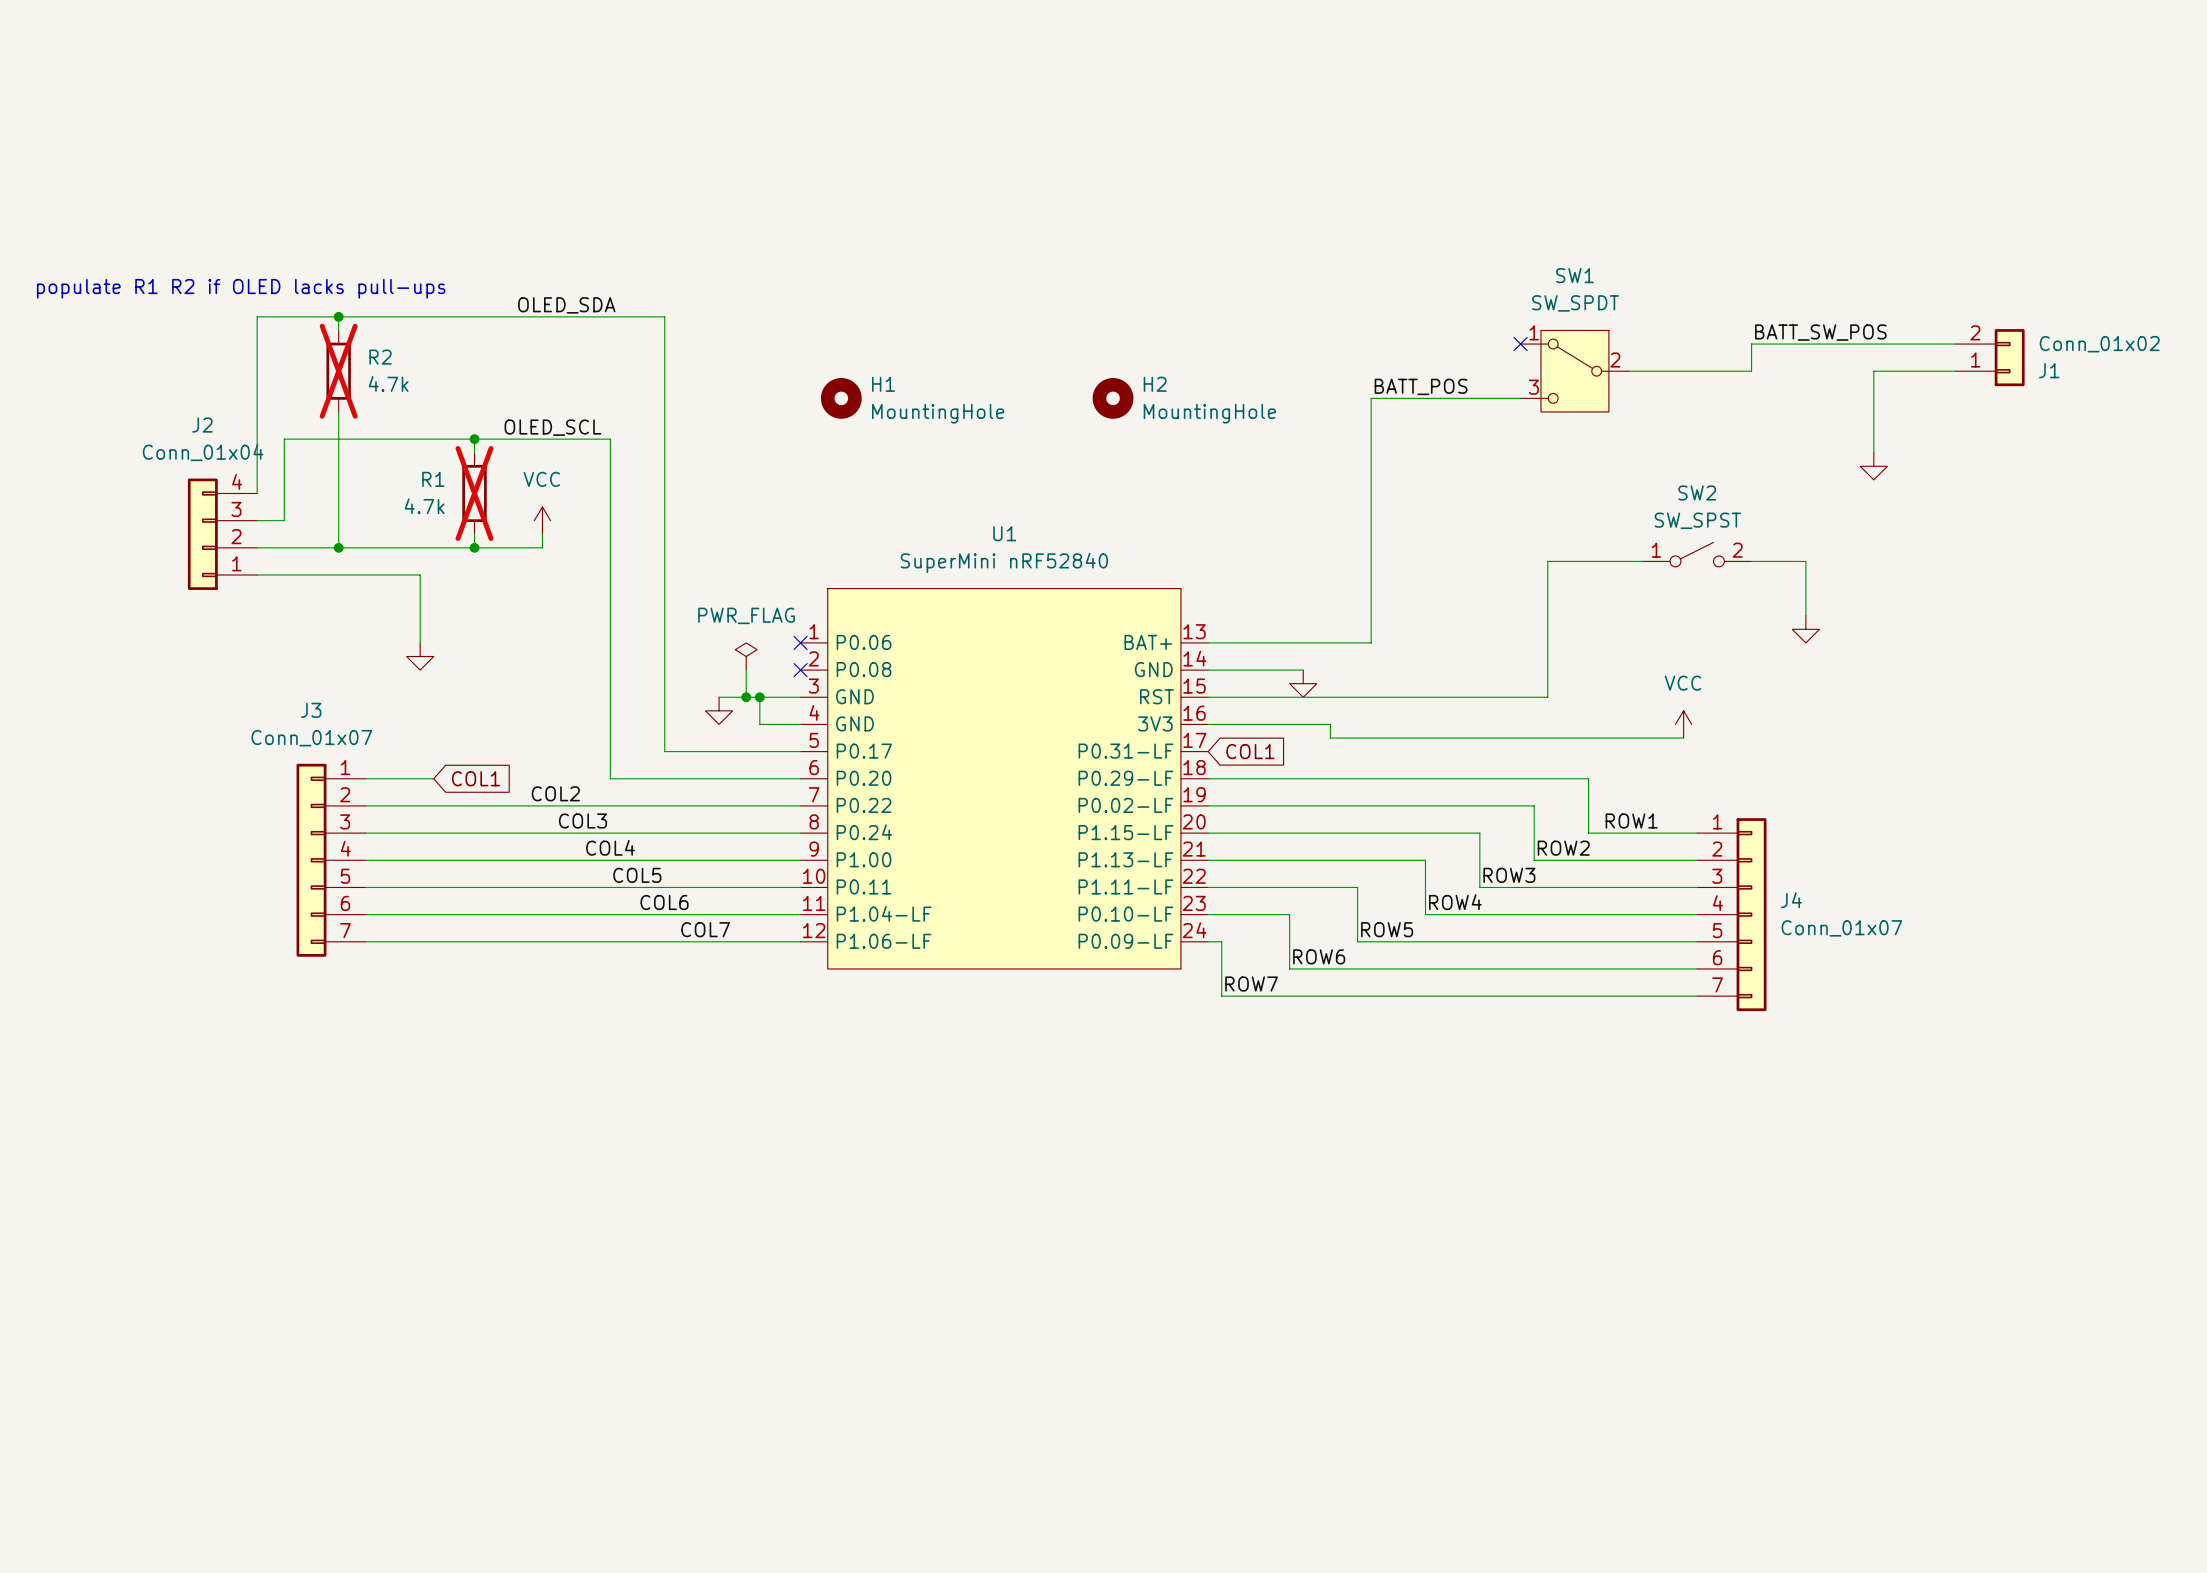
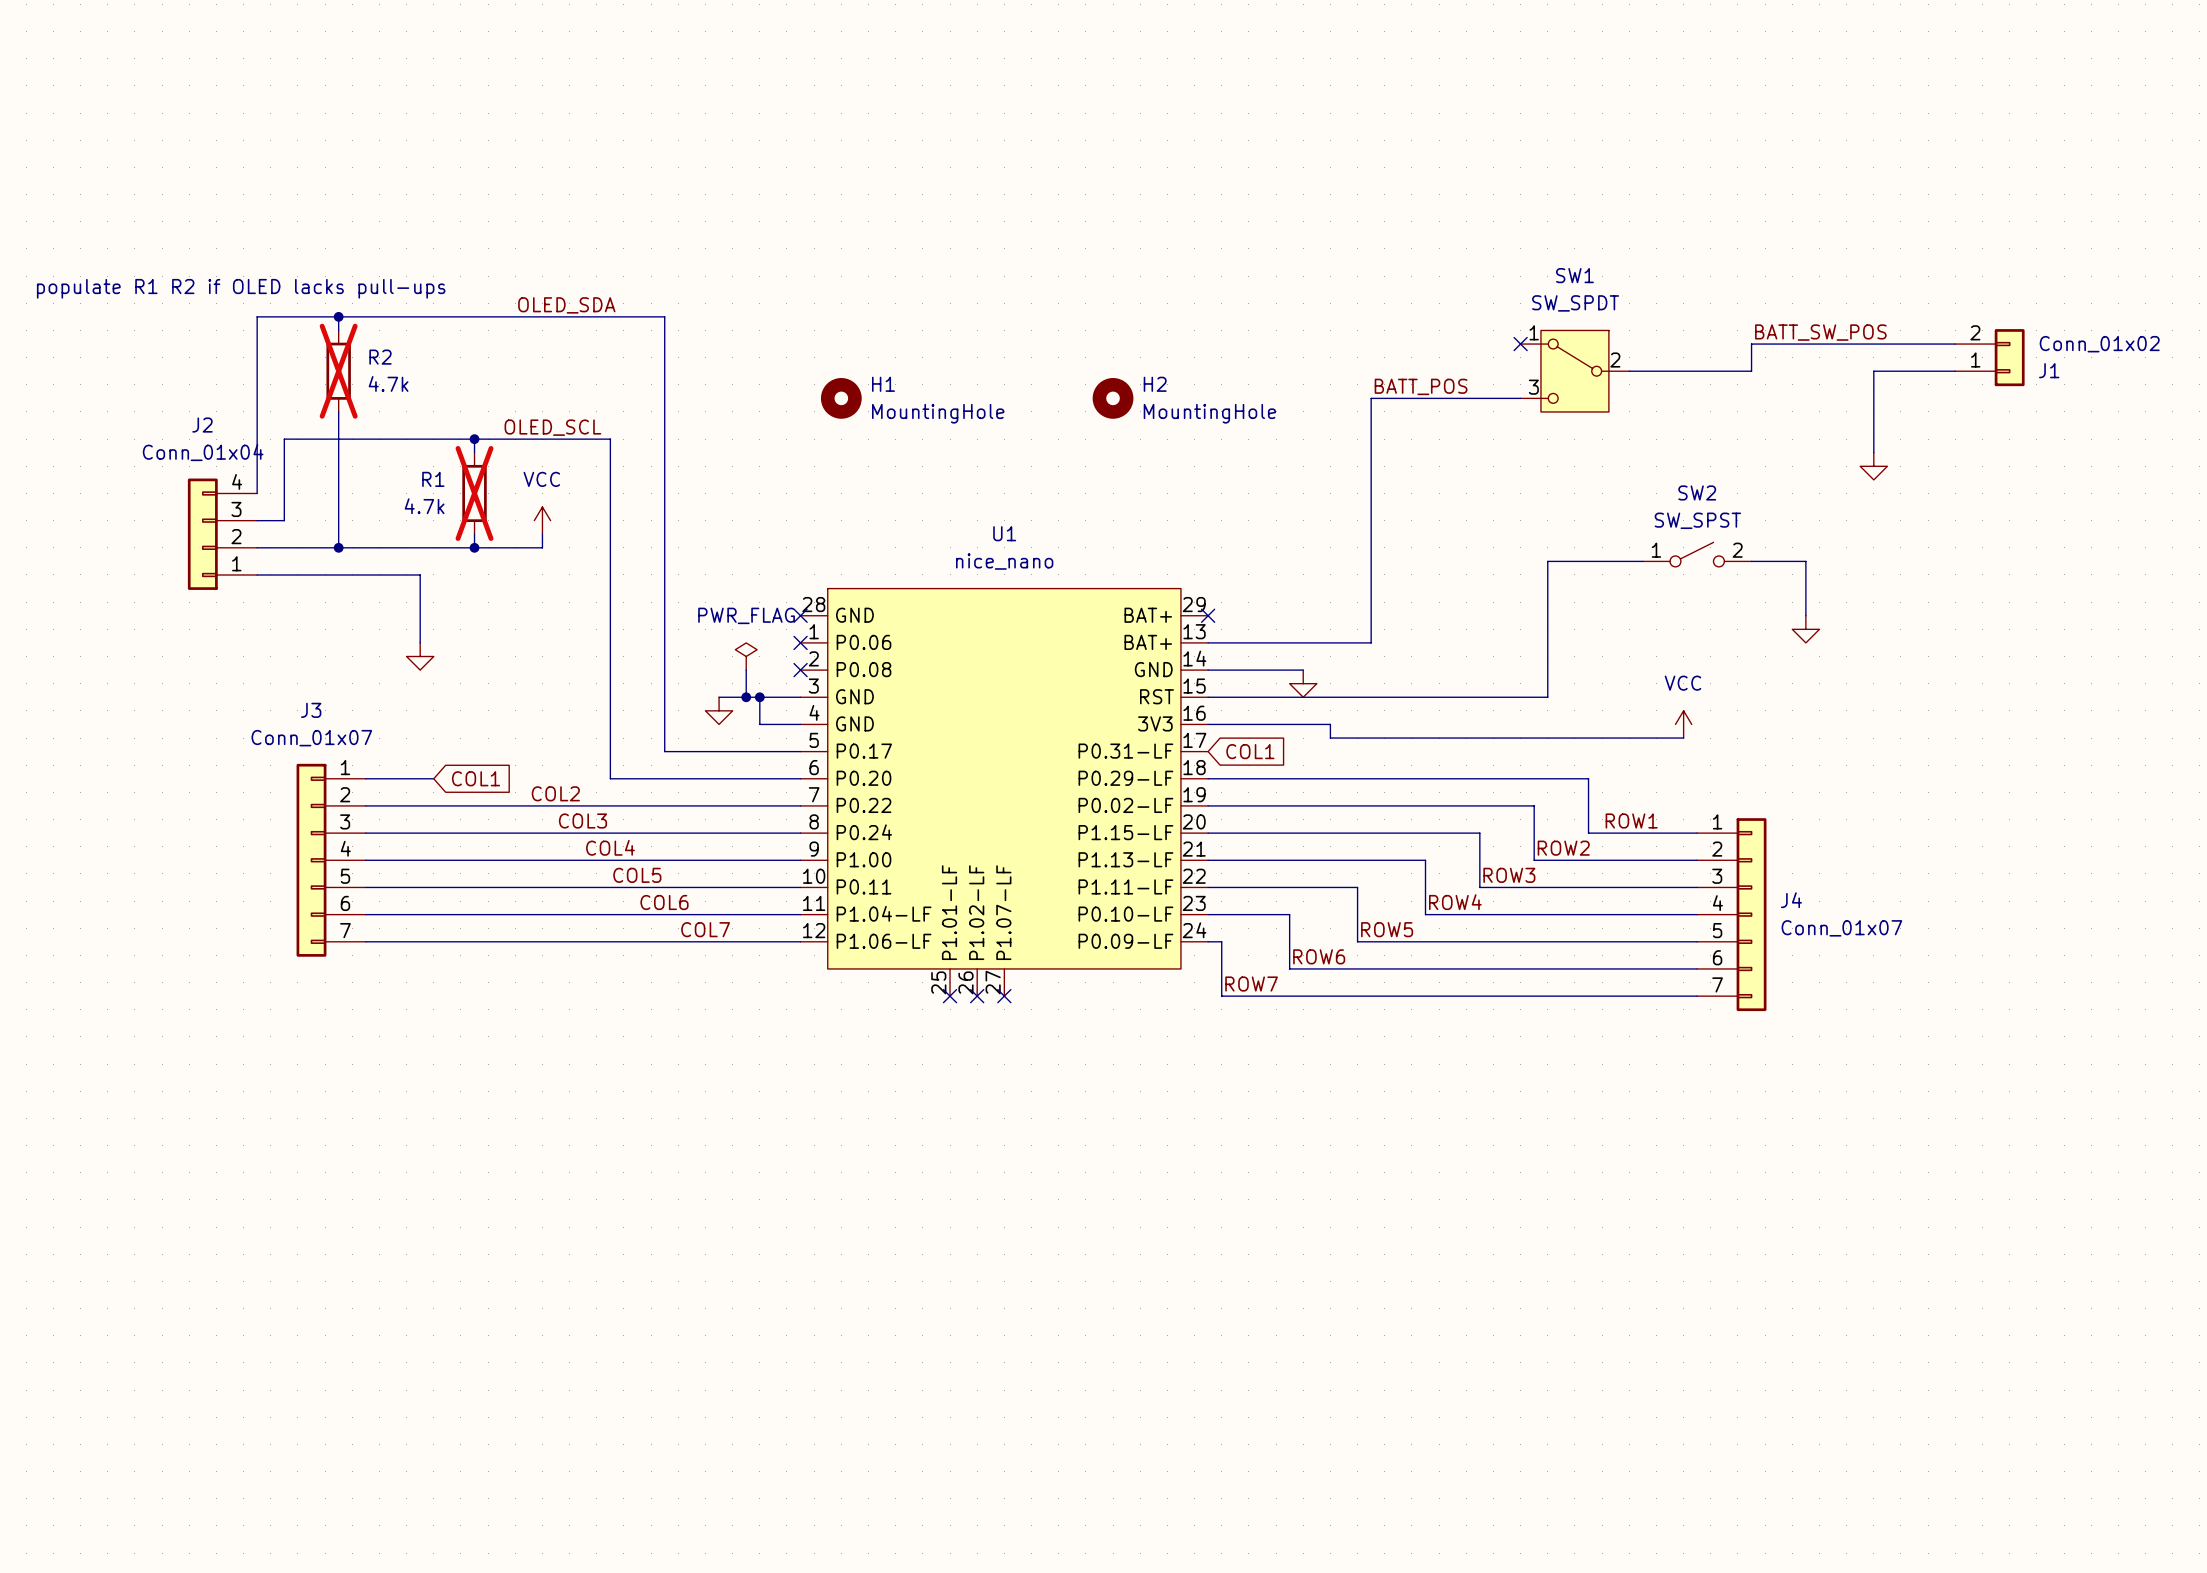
U1 value: SuperMini nRF52840 (1004, 562) -> nice_nano (1004, 561)
U1 symbol: [800, 588, 1209, 969] -> [800, 588, 1209, 997]
no-connect mark: none -> (800, 615)
no-connect mark: none -> (1208, 615)
no-connect mark: none -> (950, 996)
no-connect mark: none -> (977, 996)
no-connect mark: none -> (1004, 996)

